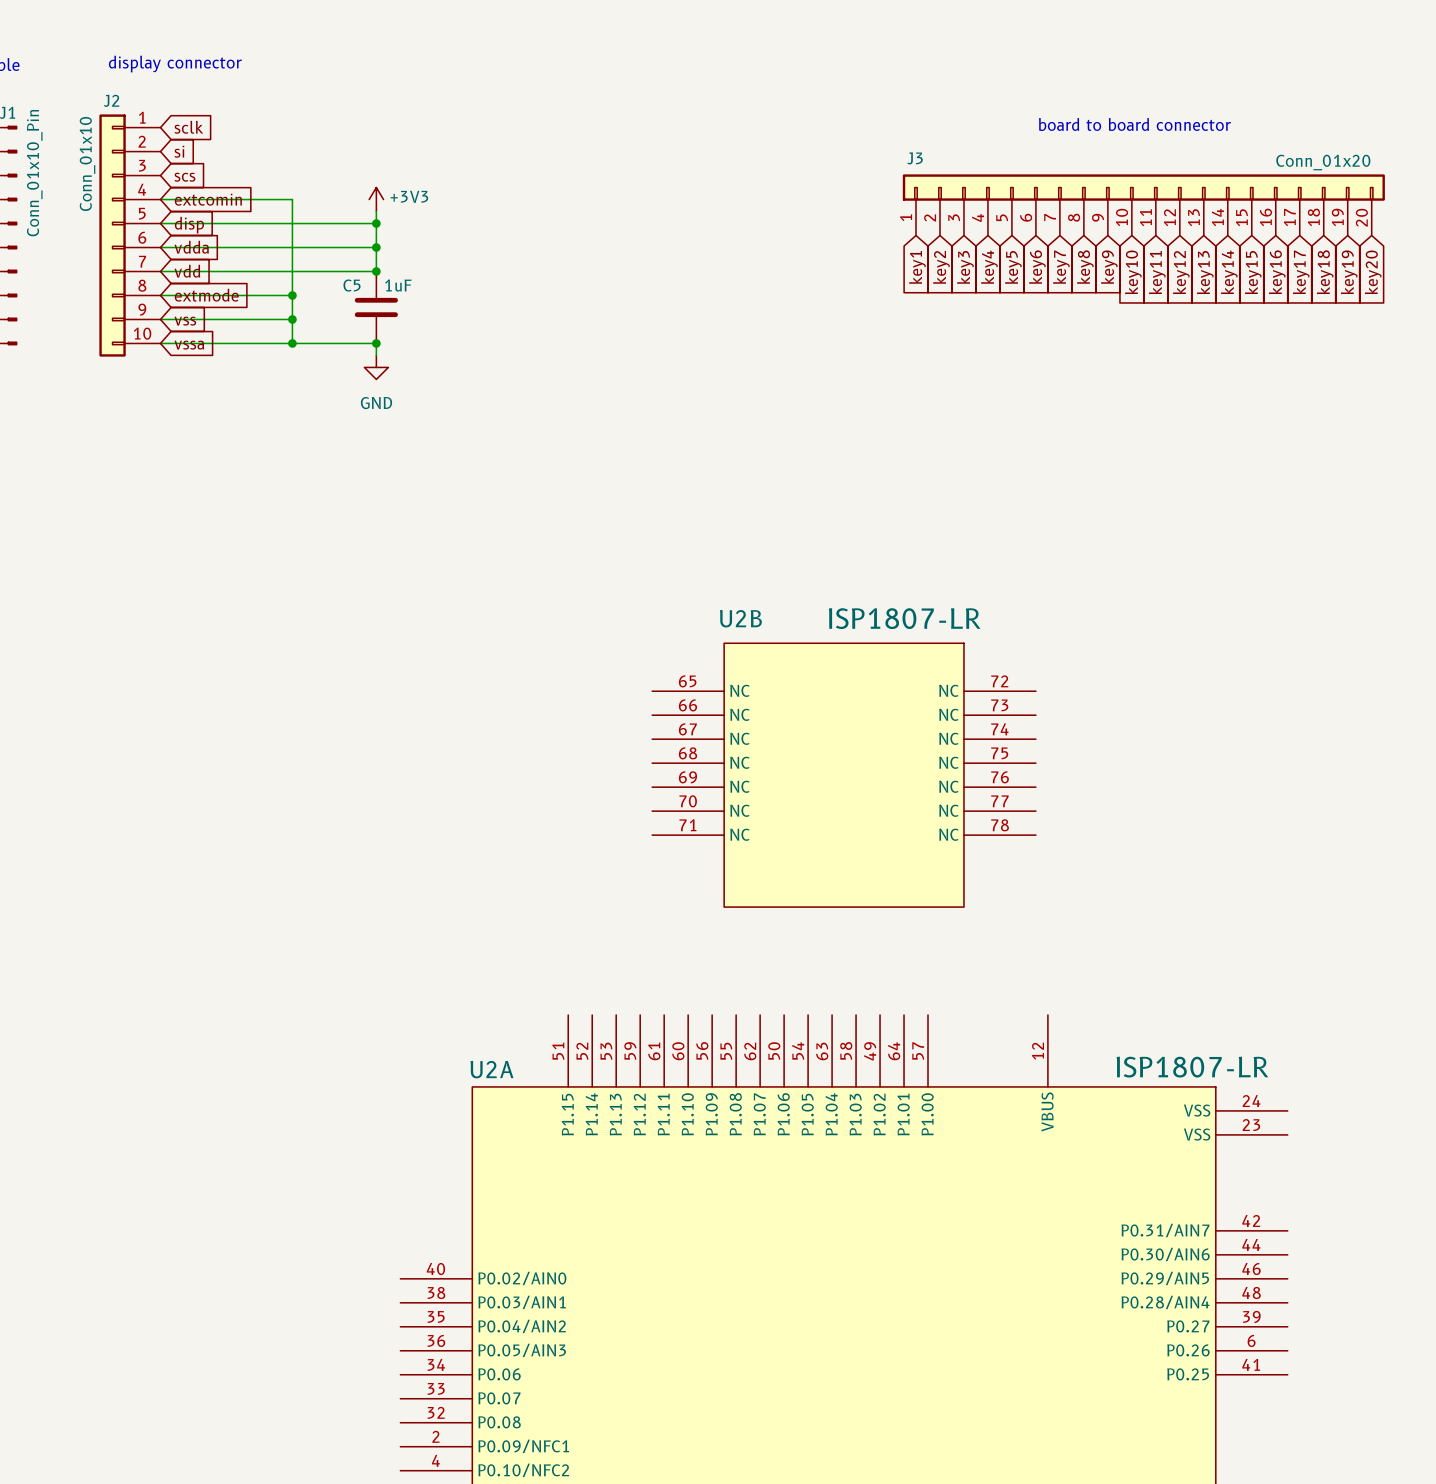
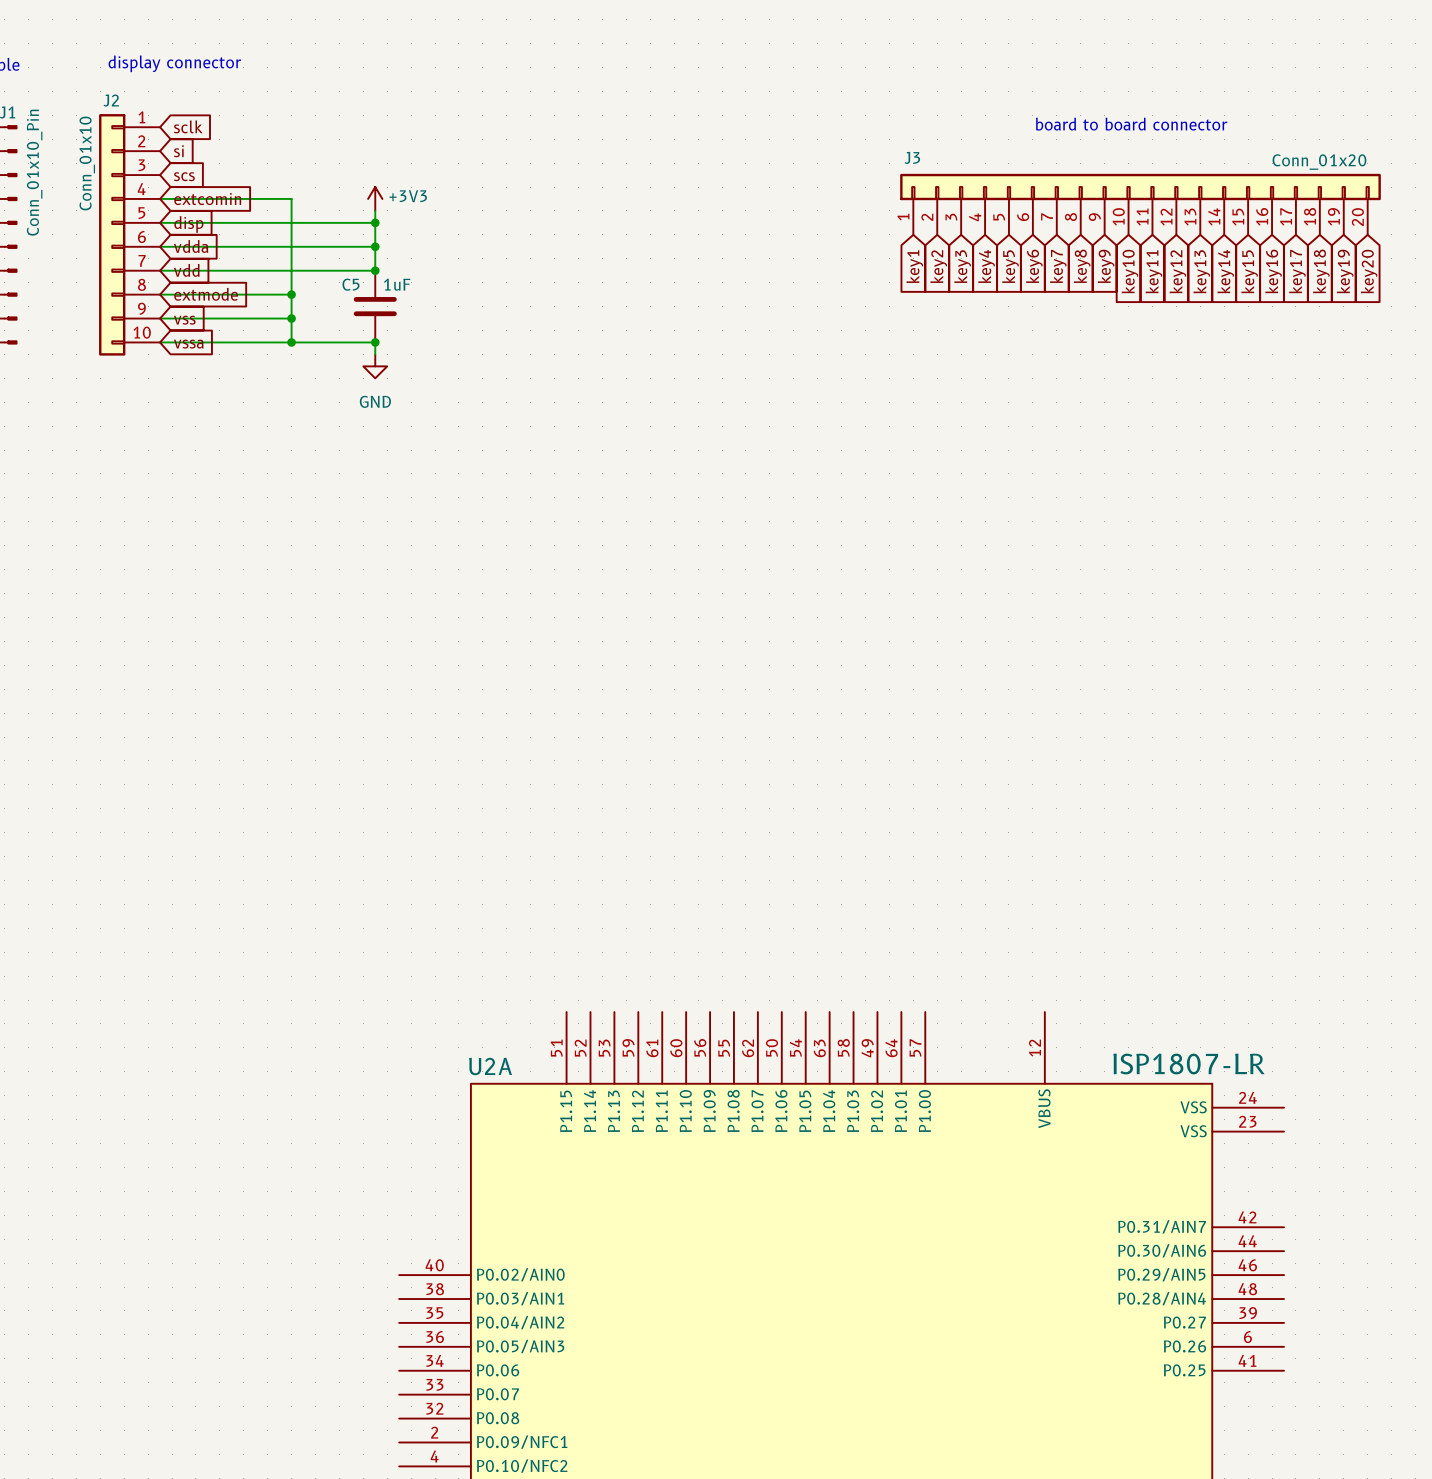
U2B: (844, 775) -> none

